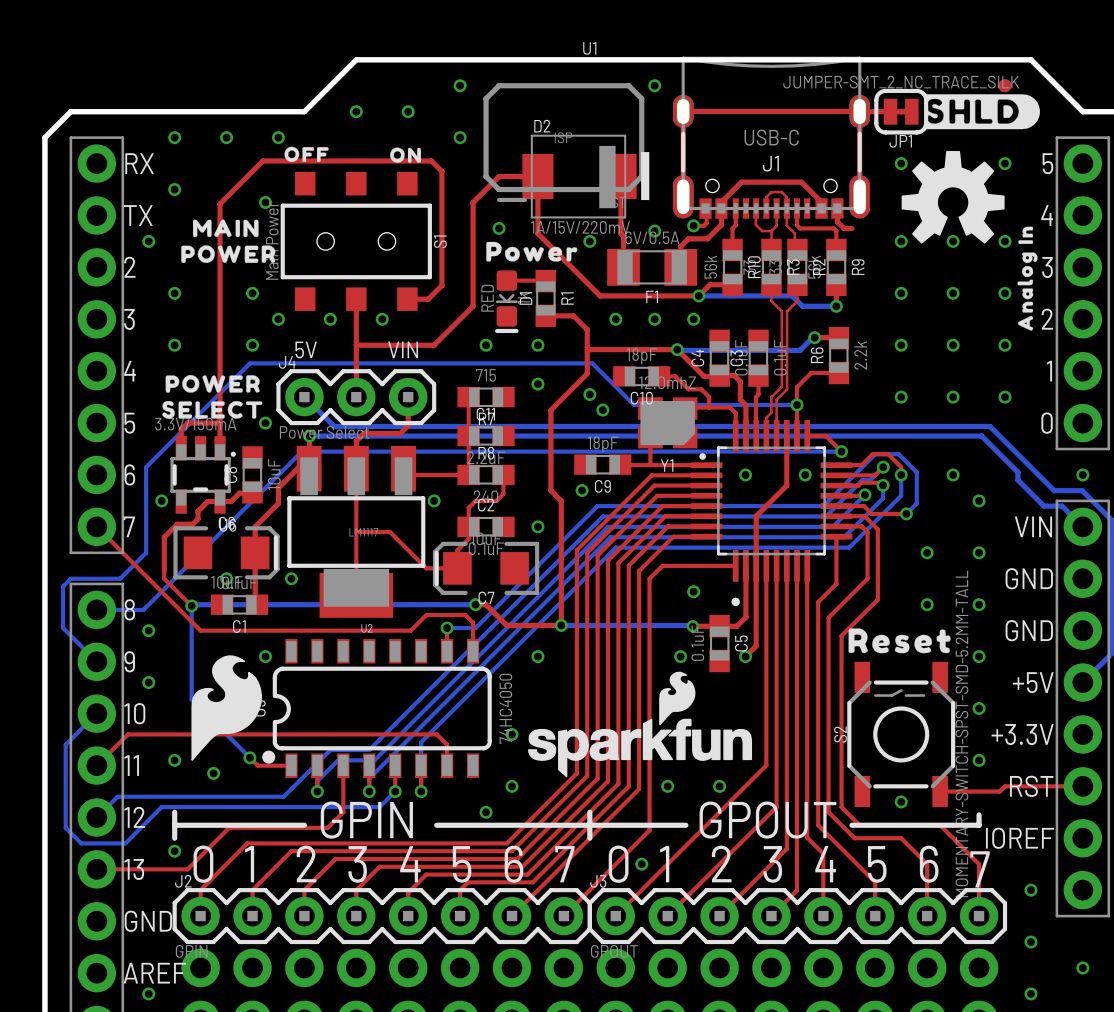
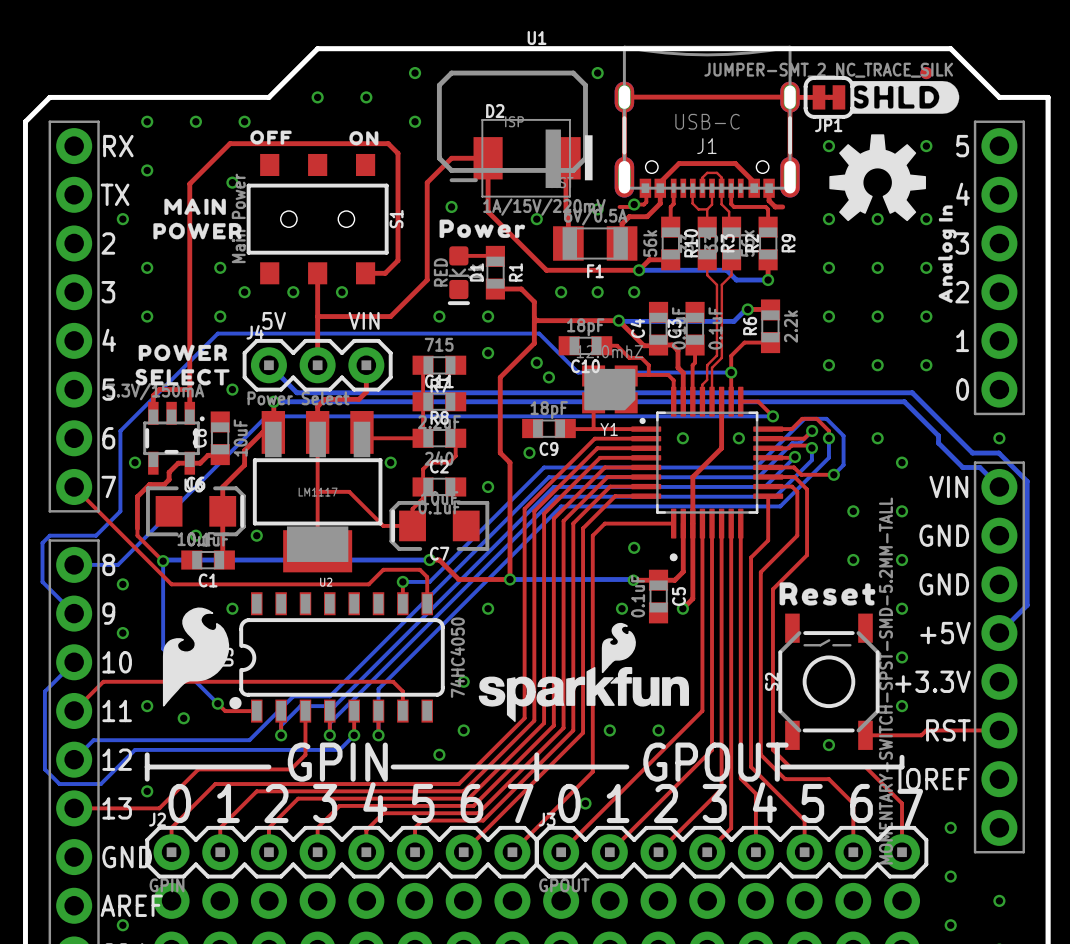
top track: none -> (619, 206) (631, 206)

